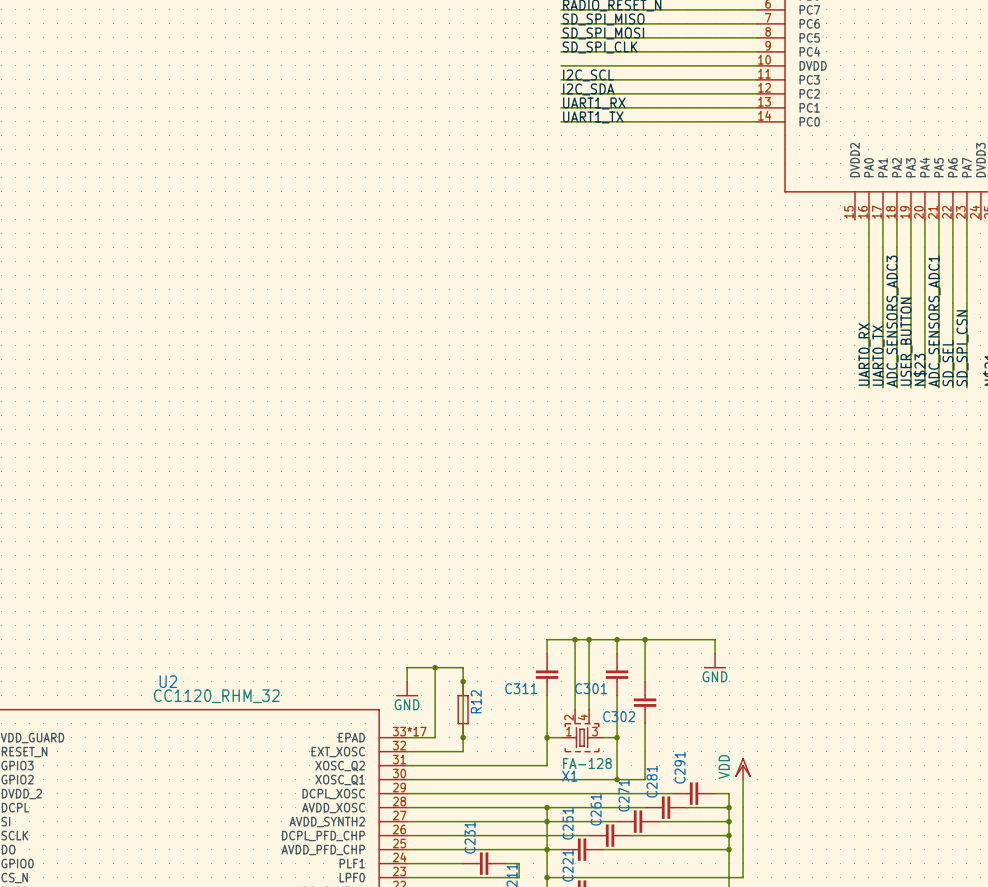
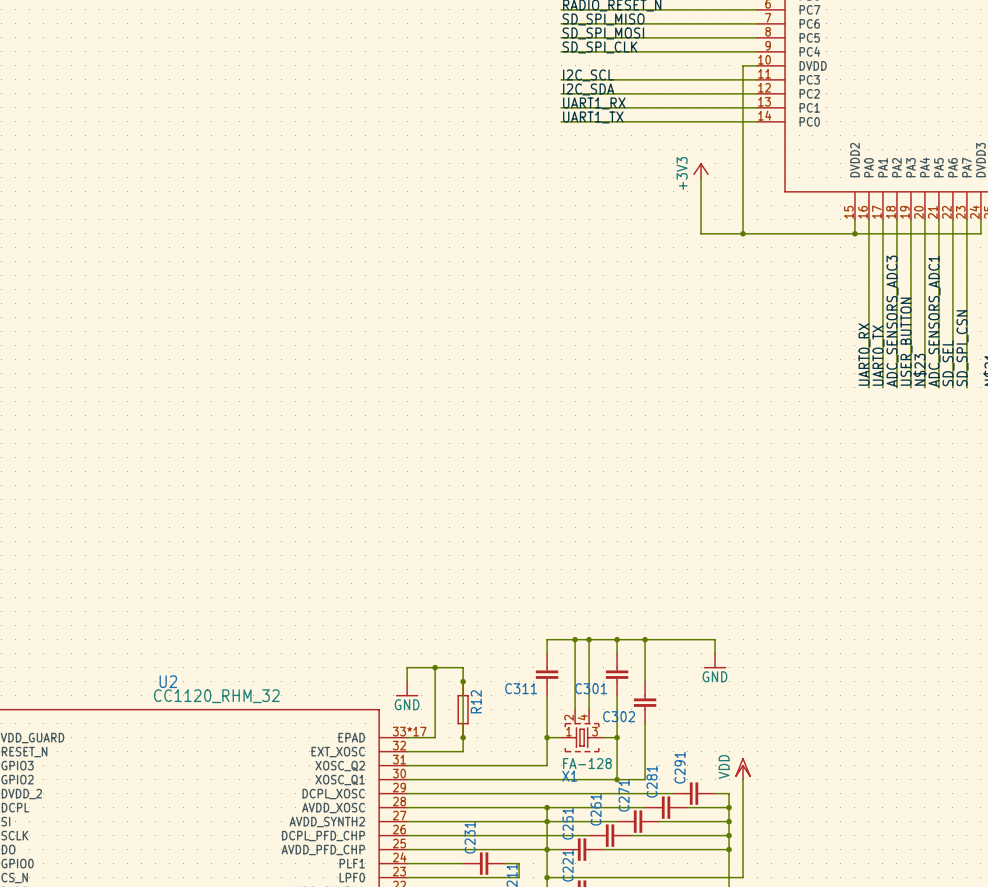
wire: (561, 65) (743, 65) -> (743, 233) (743, 65)
power symbol: none -> +3V3 (701, 170)
wire: none -> (701, 177) (701, 233) (980, 233) (980, 219)
wire: none -> (854, 219) (854, 233)
junction: none -> (743, 233)
junction: none -> (854, 233)

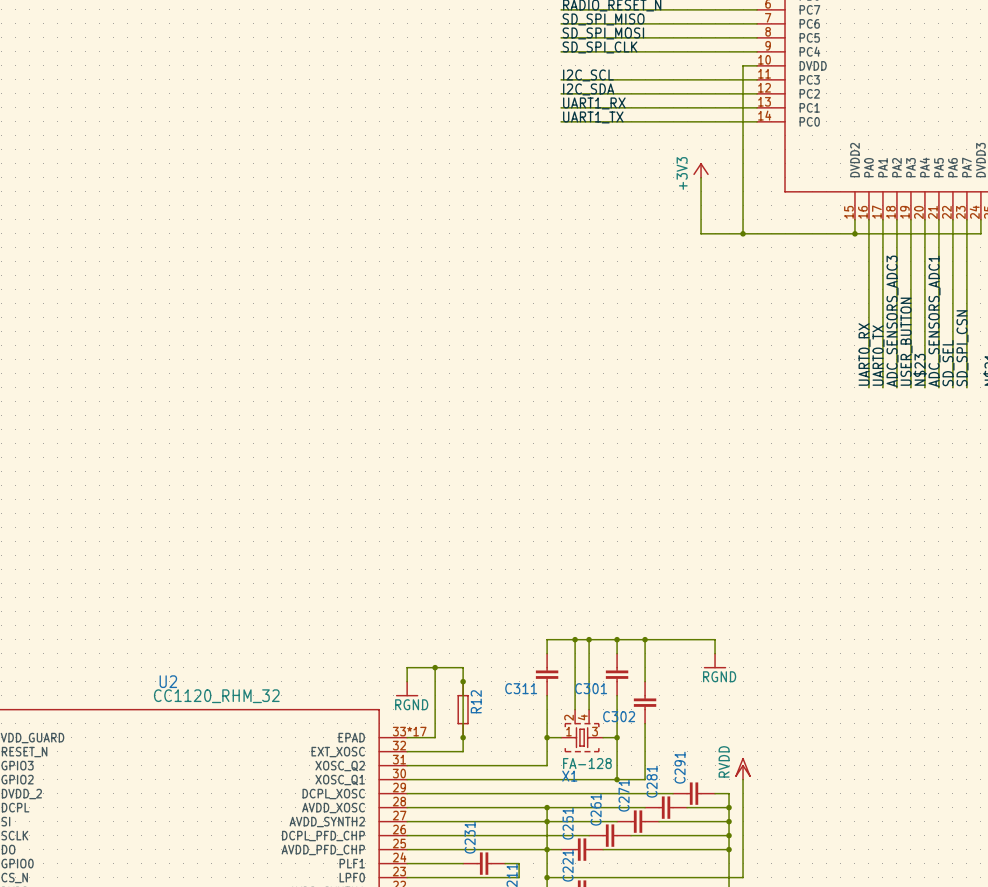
power symbol: GND (715, 661) -> RGND (715, 661)
power symbol: GND (407, 689) -> RGND (407, 689)
power symbol: VDD (743, 768) -> RVDD (743, 768)

